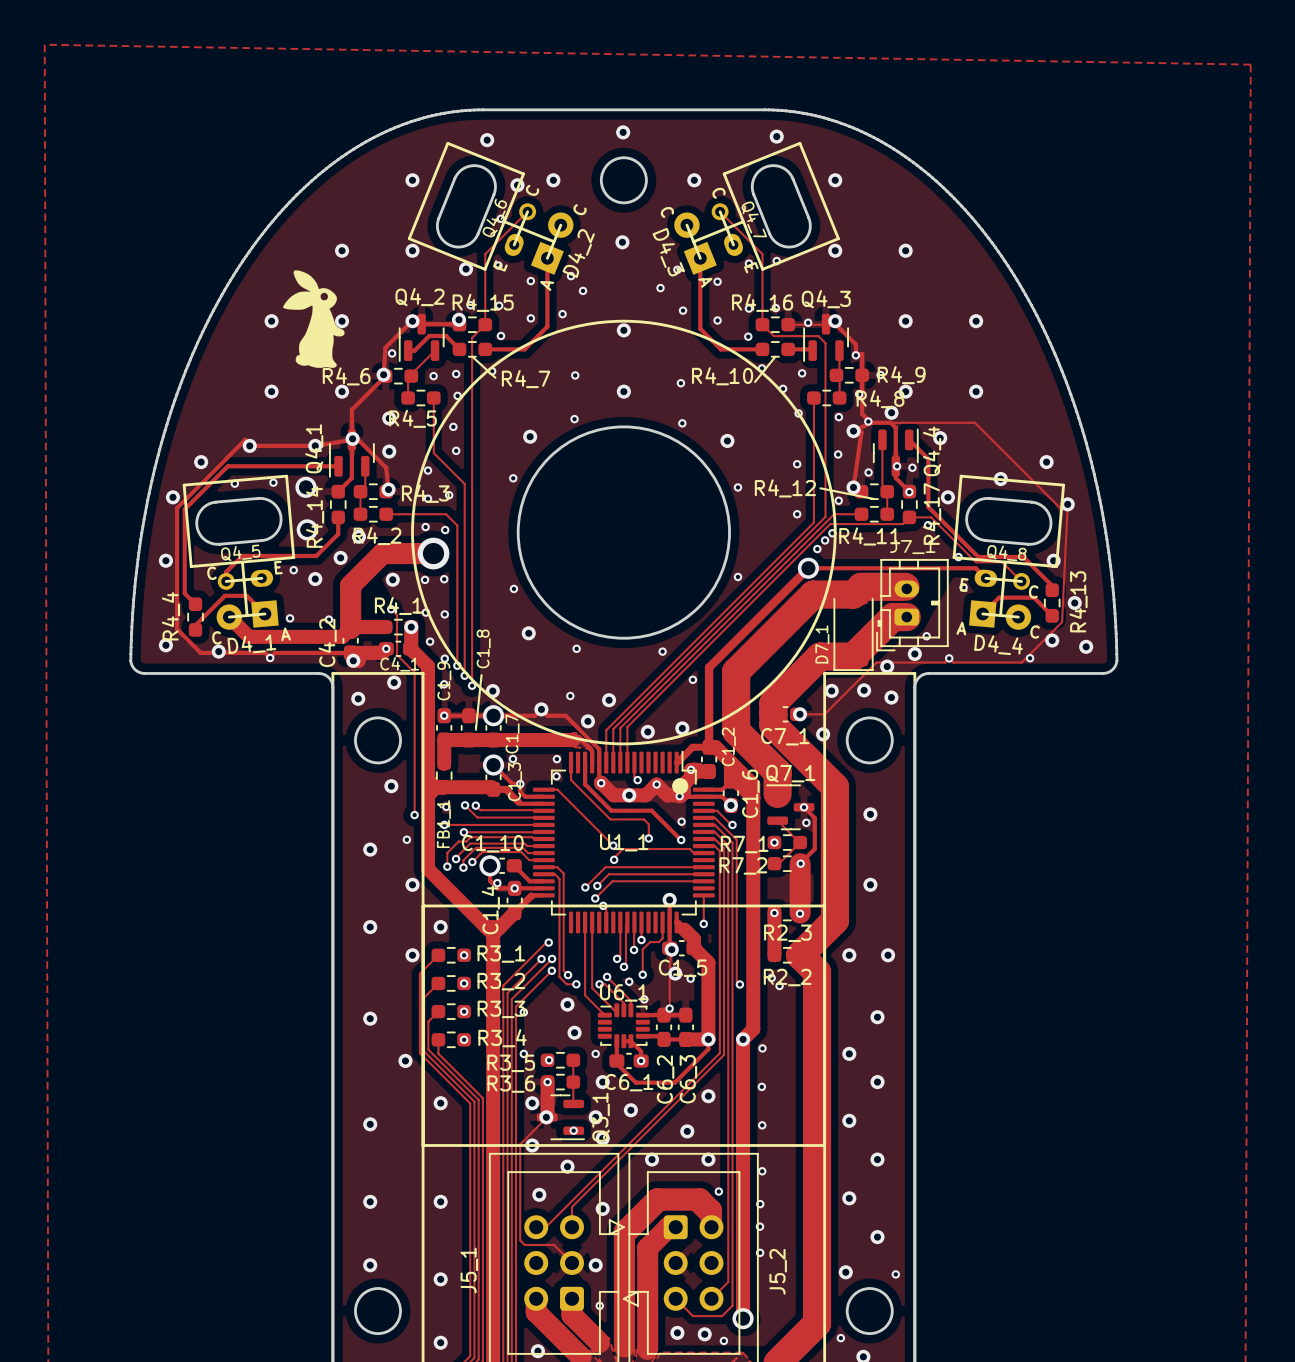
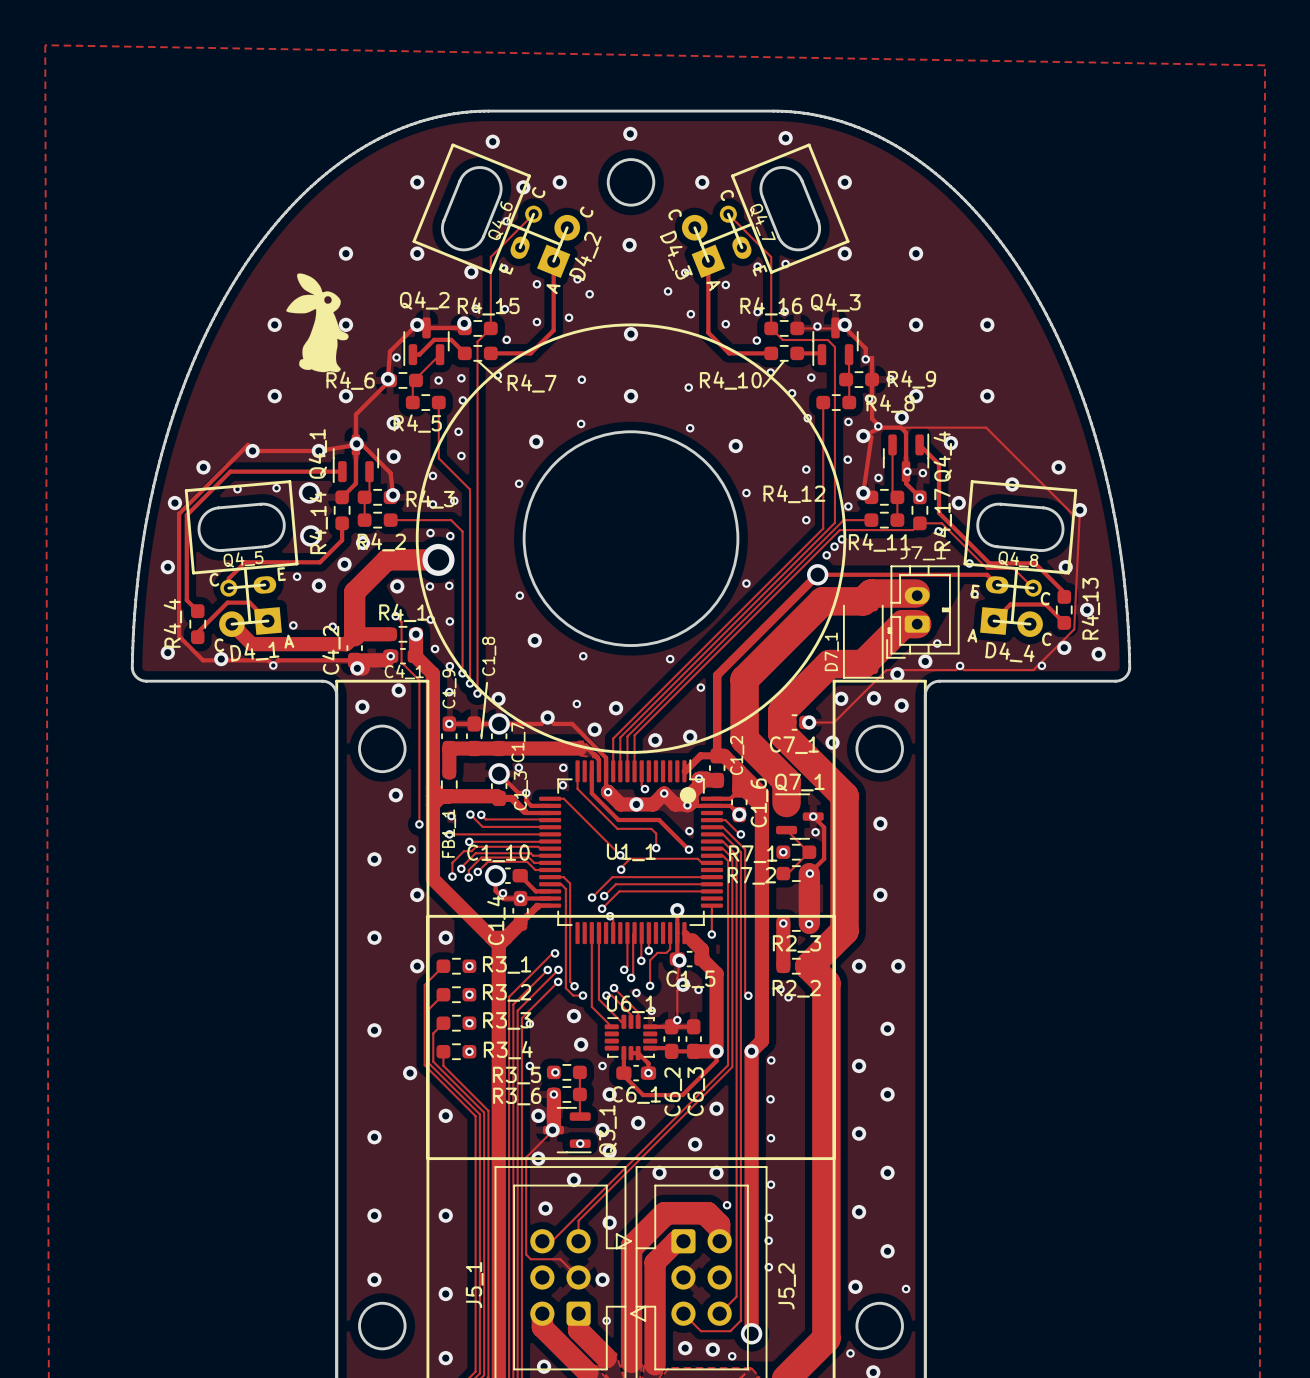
line: (820, 488) (874, 499) -> none

